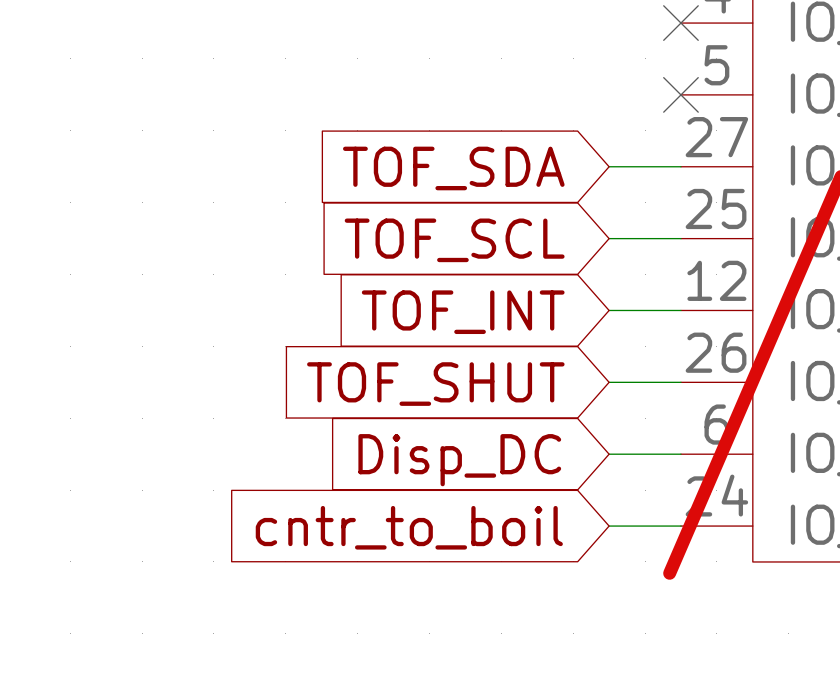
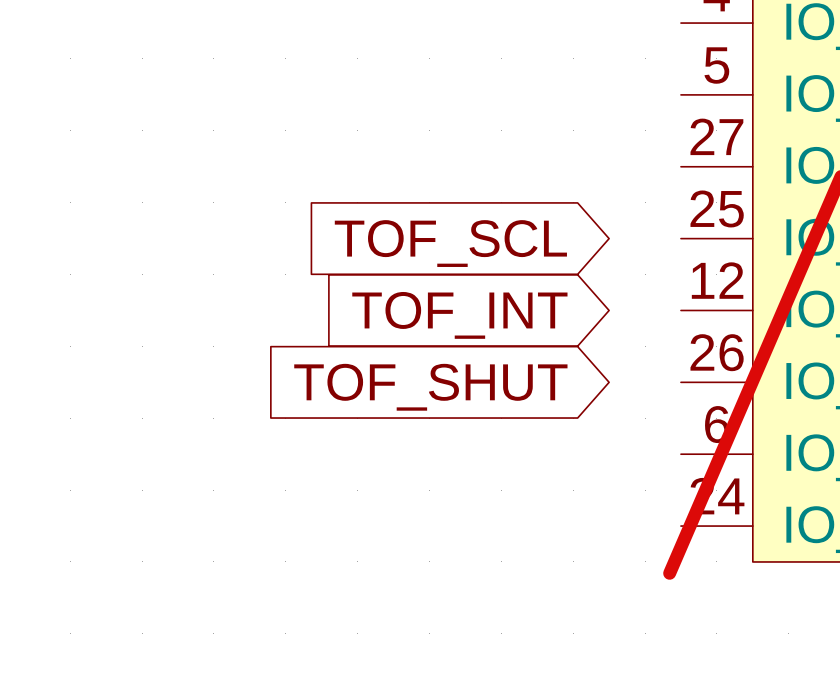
no-connect mark: (680, 23) -> none
no-connect mark: (680, 94) -> none
wire: (609, 166) (680, 166) -> none
global label: TOF_SDA (453, 168) -> none
wire: (609, 238) (680, 238) -> none
wire: (609, 310) (680, 310) -> none
wire: (609, 382) (680, 382) -> none
wire: (609, 454) (680, 454) -> none
global label: Disp_DC (459, 460) -> none
wire: (609, 526) (680, 526) -> none
global label: cntr_to_boil (409, 527) -> none

